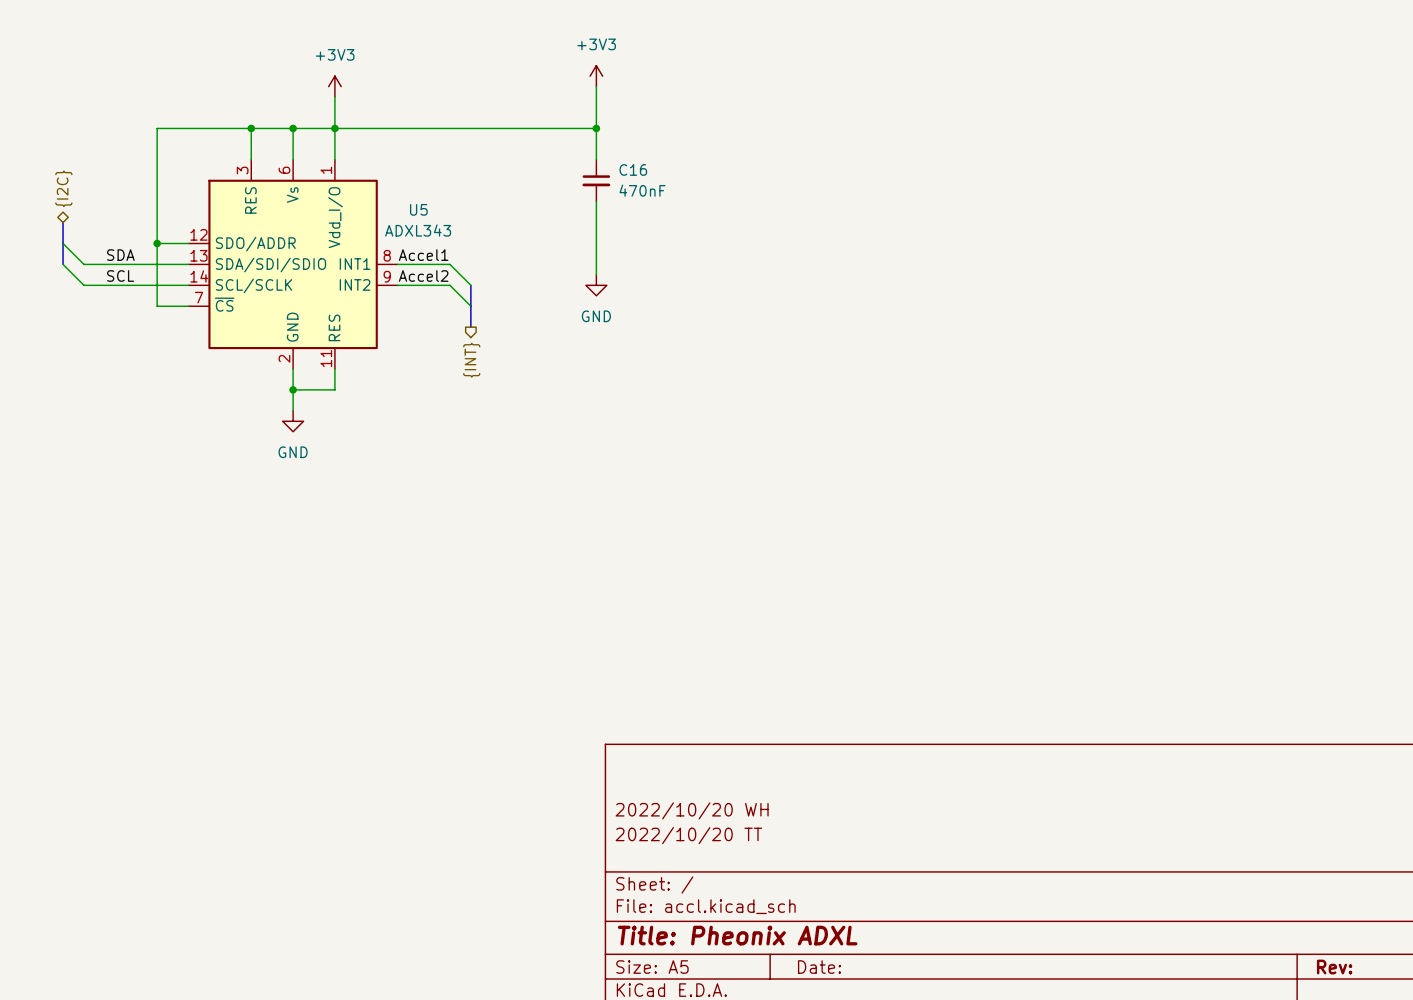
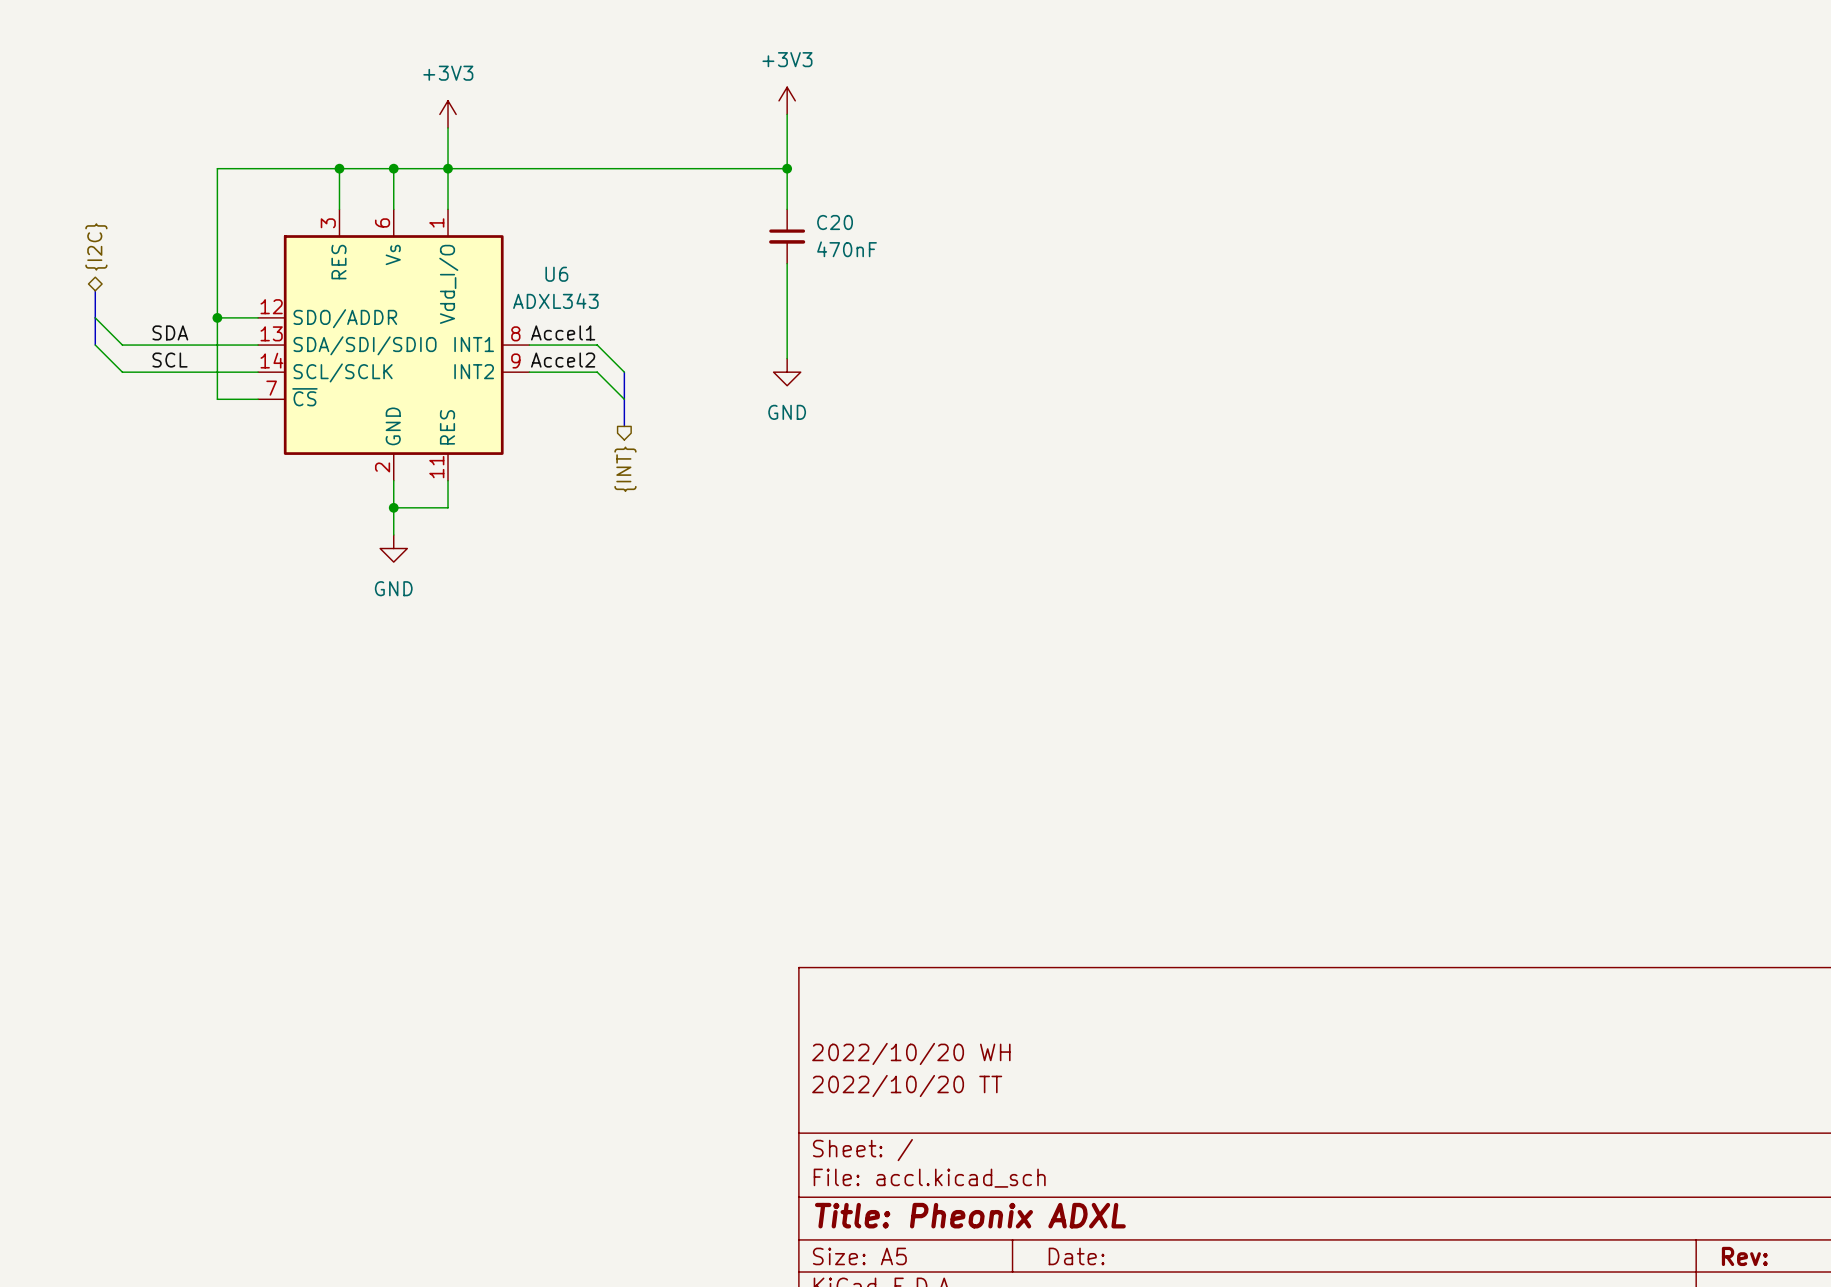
C16 name: C16 (633, 169) -> C20 (835, 222)
U5 name: U5 (418, 209) -> U6 (556, 274)

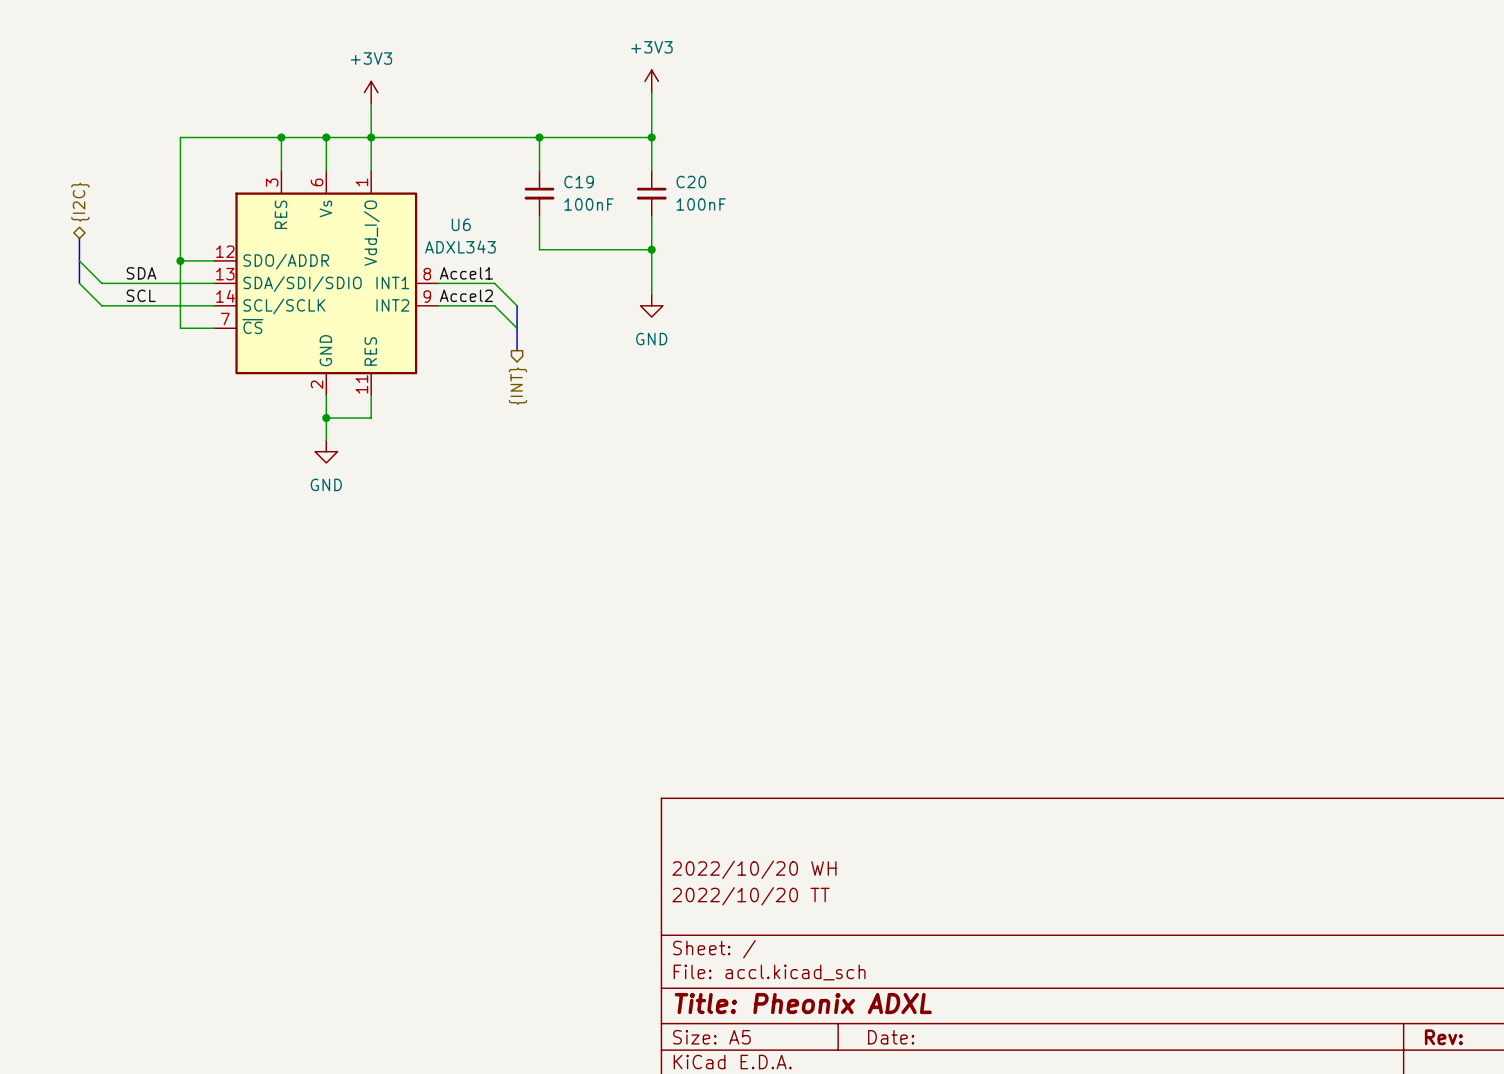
wire: none -> (539, 137) (539, 171)
junction: none -> (539, 137)
C19: none -> 100nF (539, 193)
C20 value: 470nF (847, 249) -> 100nF (701, 204)
wire: none -> (539, 216) (539, 249) (651, 249)
junction: none -> (651, 249)

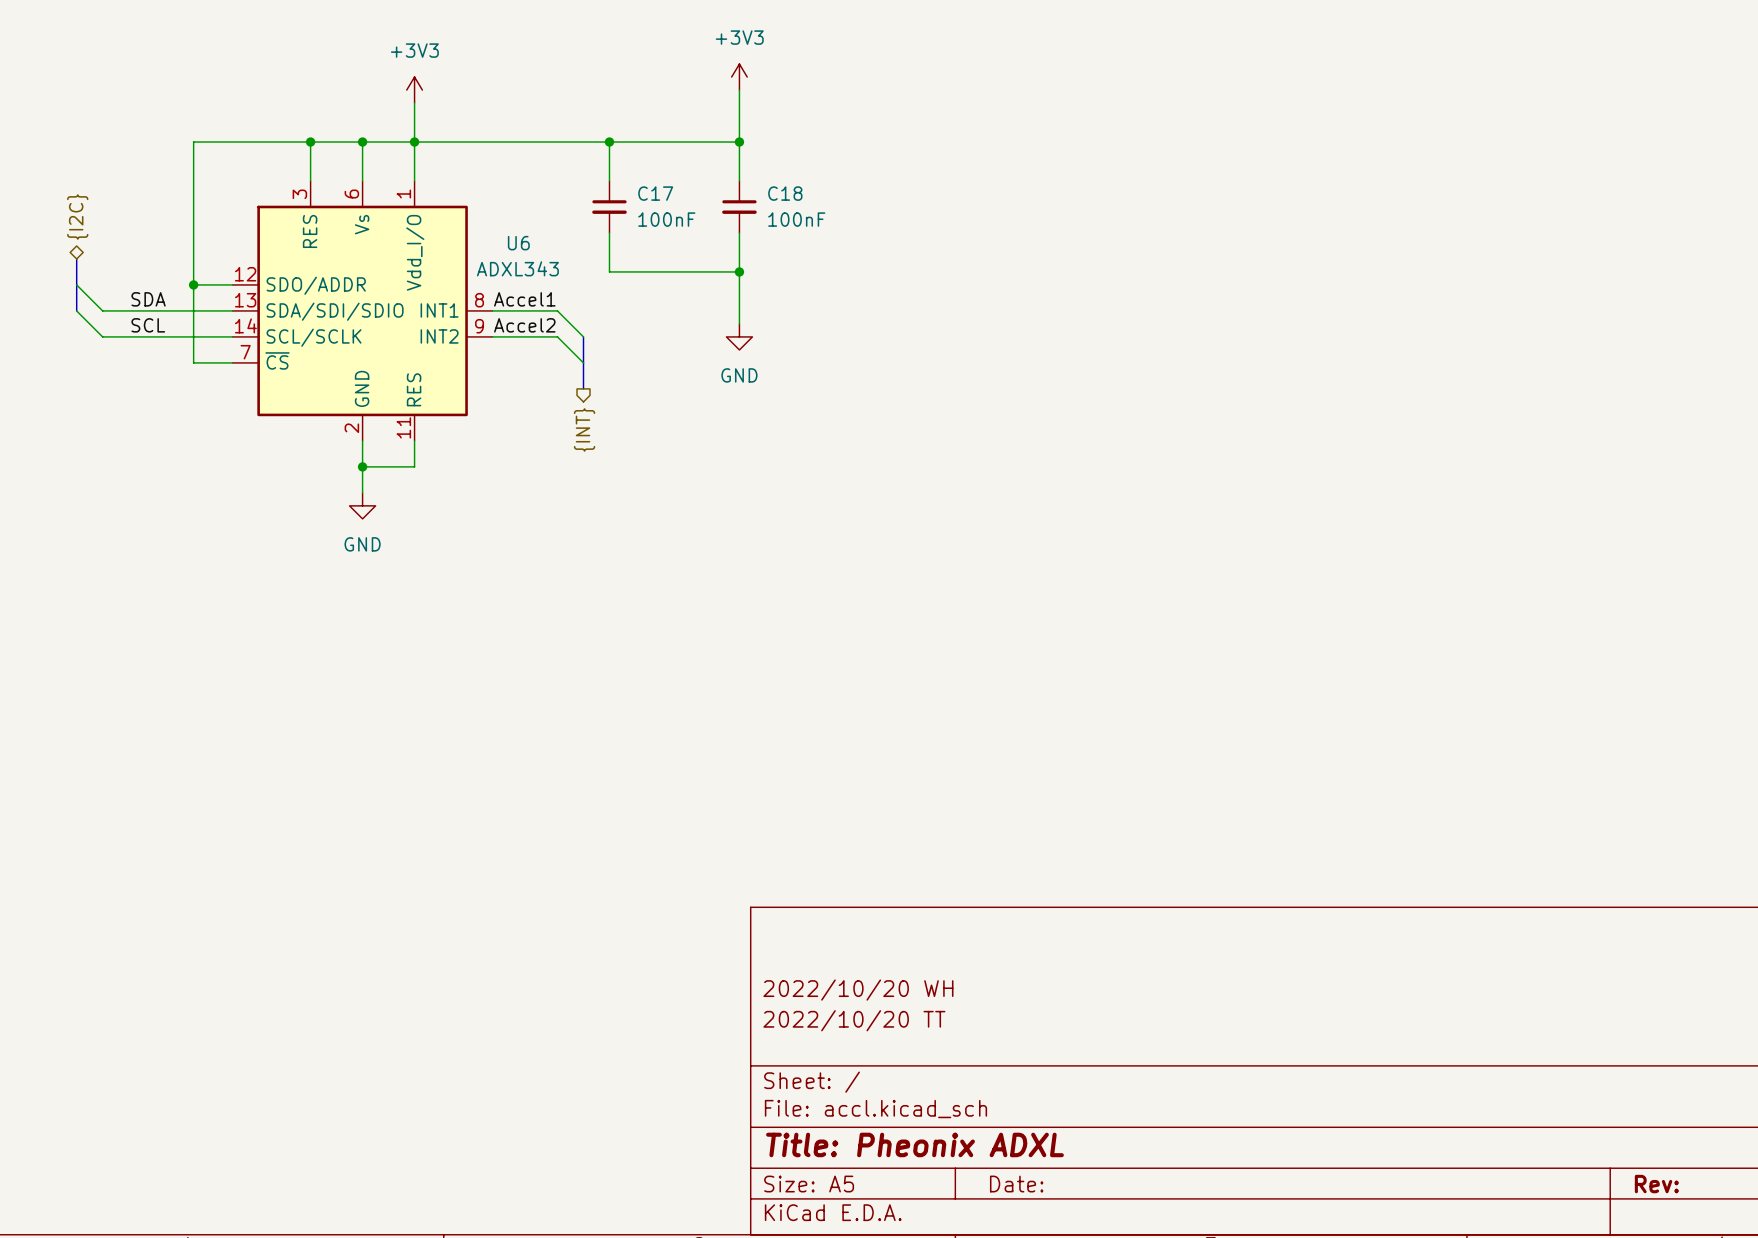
C19 name: C19 (579, 182) -> C17 (655, 193)
C20 name: C20 (691, 182) -> C18 (785, 193)

